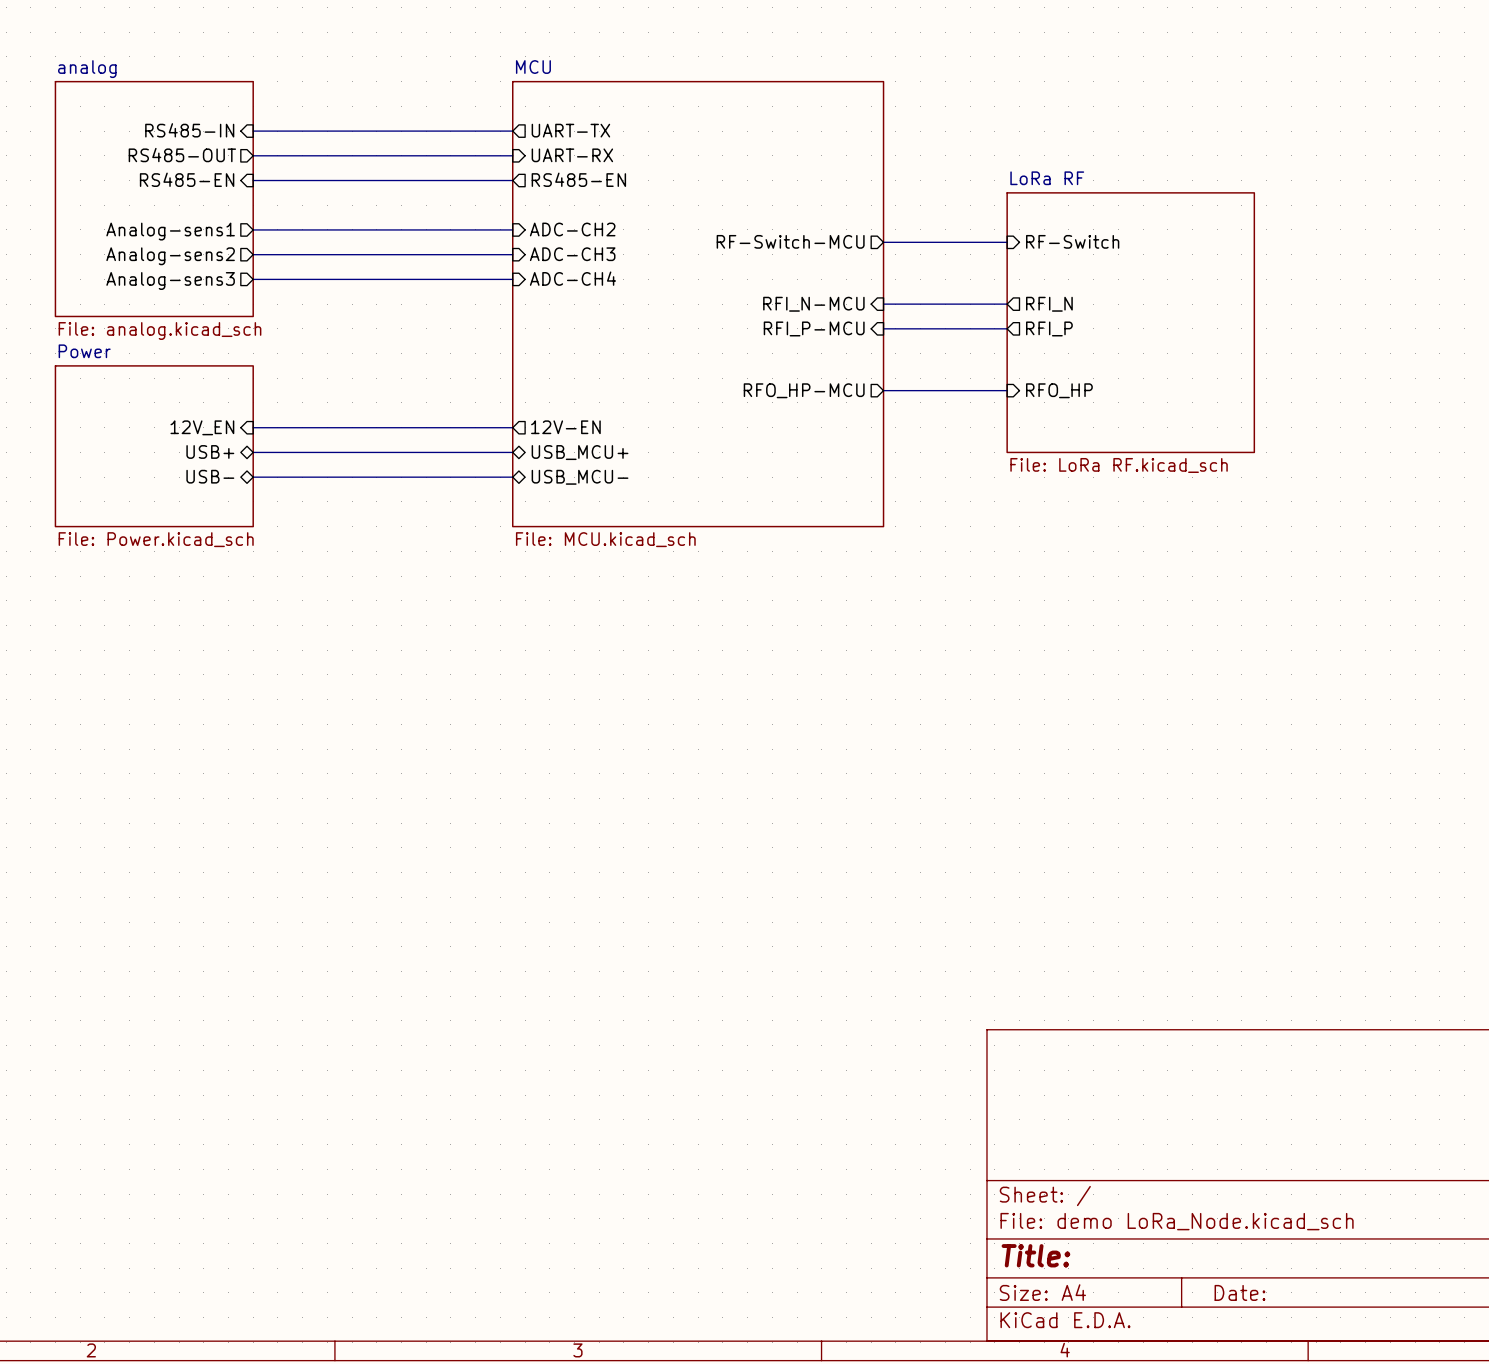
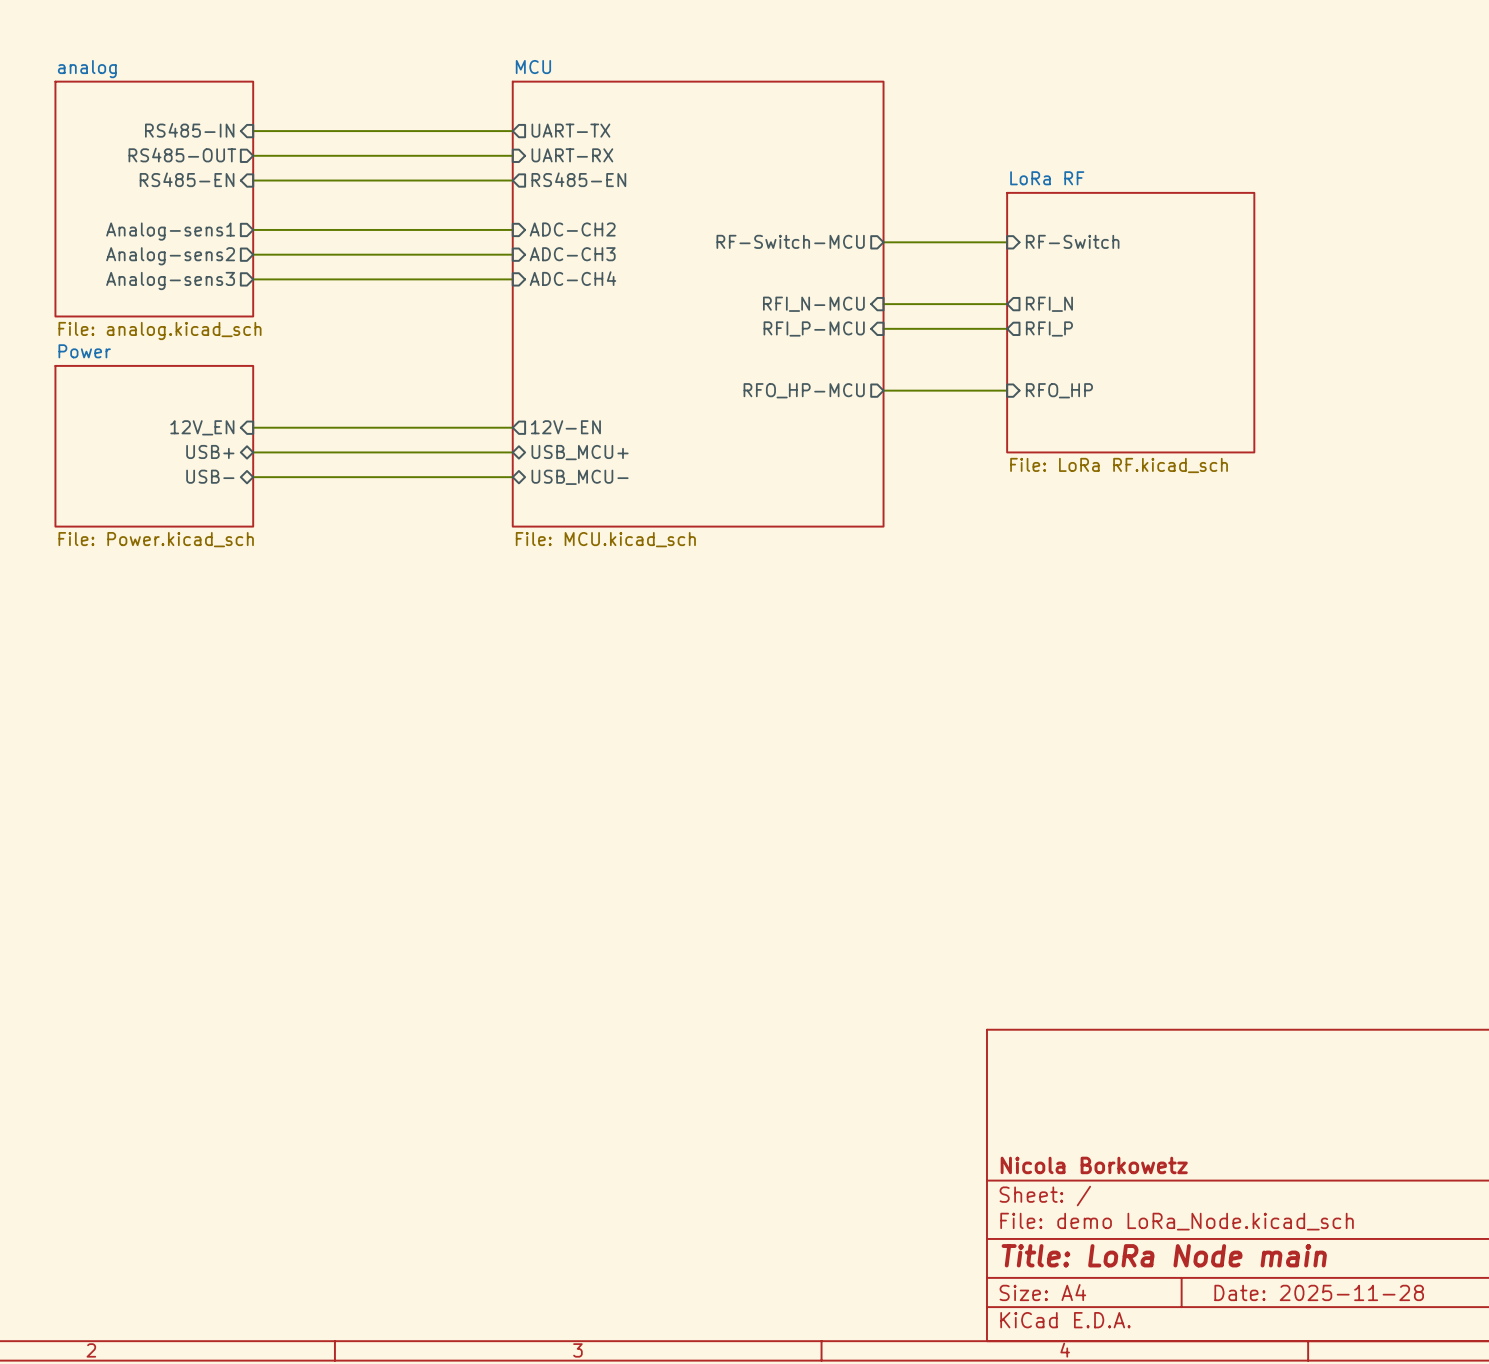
title block: none -> Nicola Borkowetz (1094, 1165)
title block: Title: (1035, 1255) -> Title: LoRa Node main (1164, 1255)
title block: Date: (1239, 1292) -> Date: 2025-11-28 (1319, 1292)

